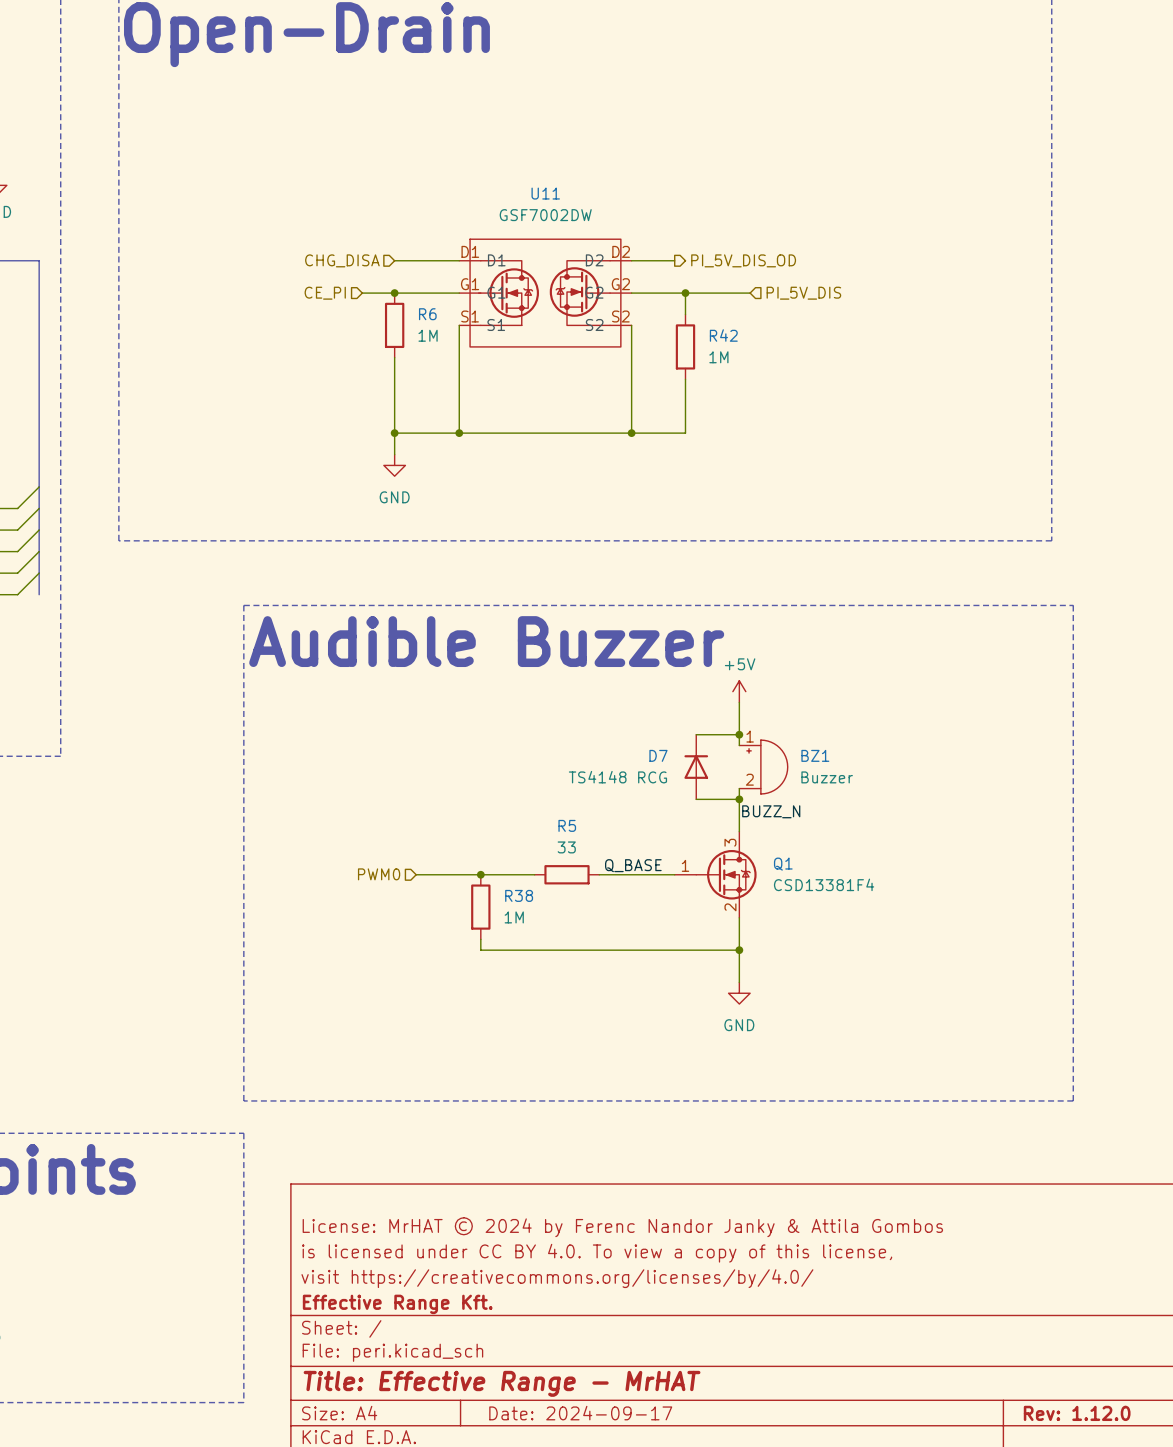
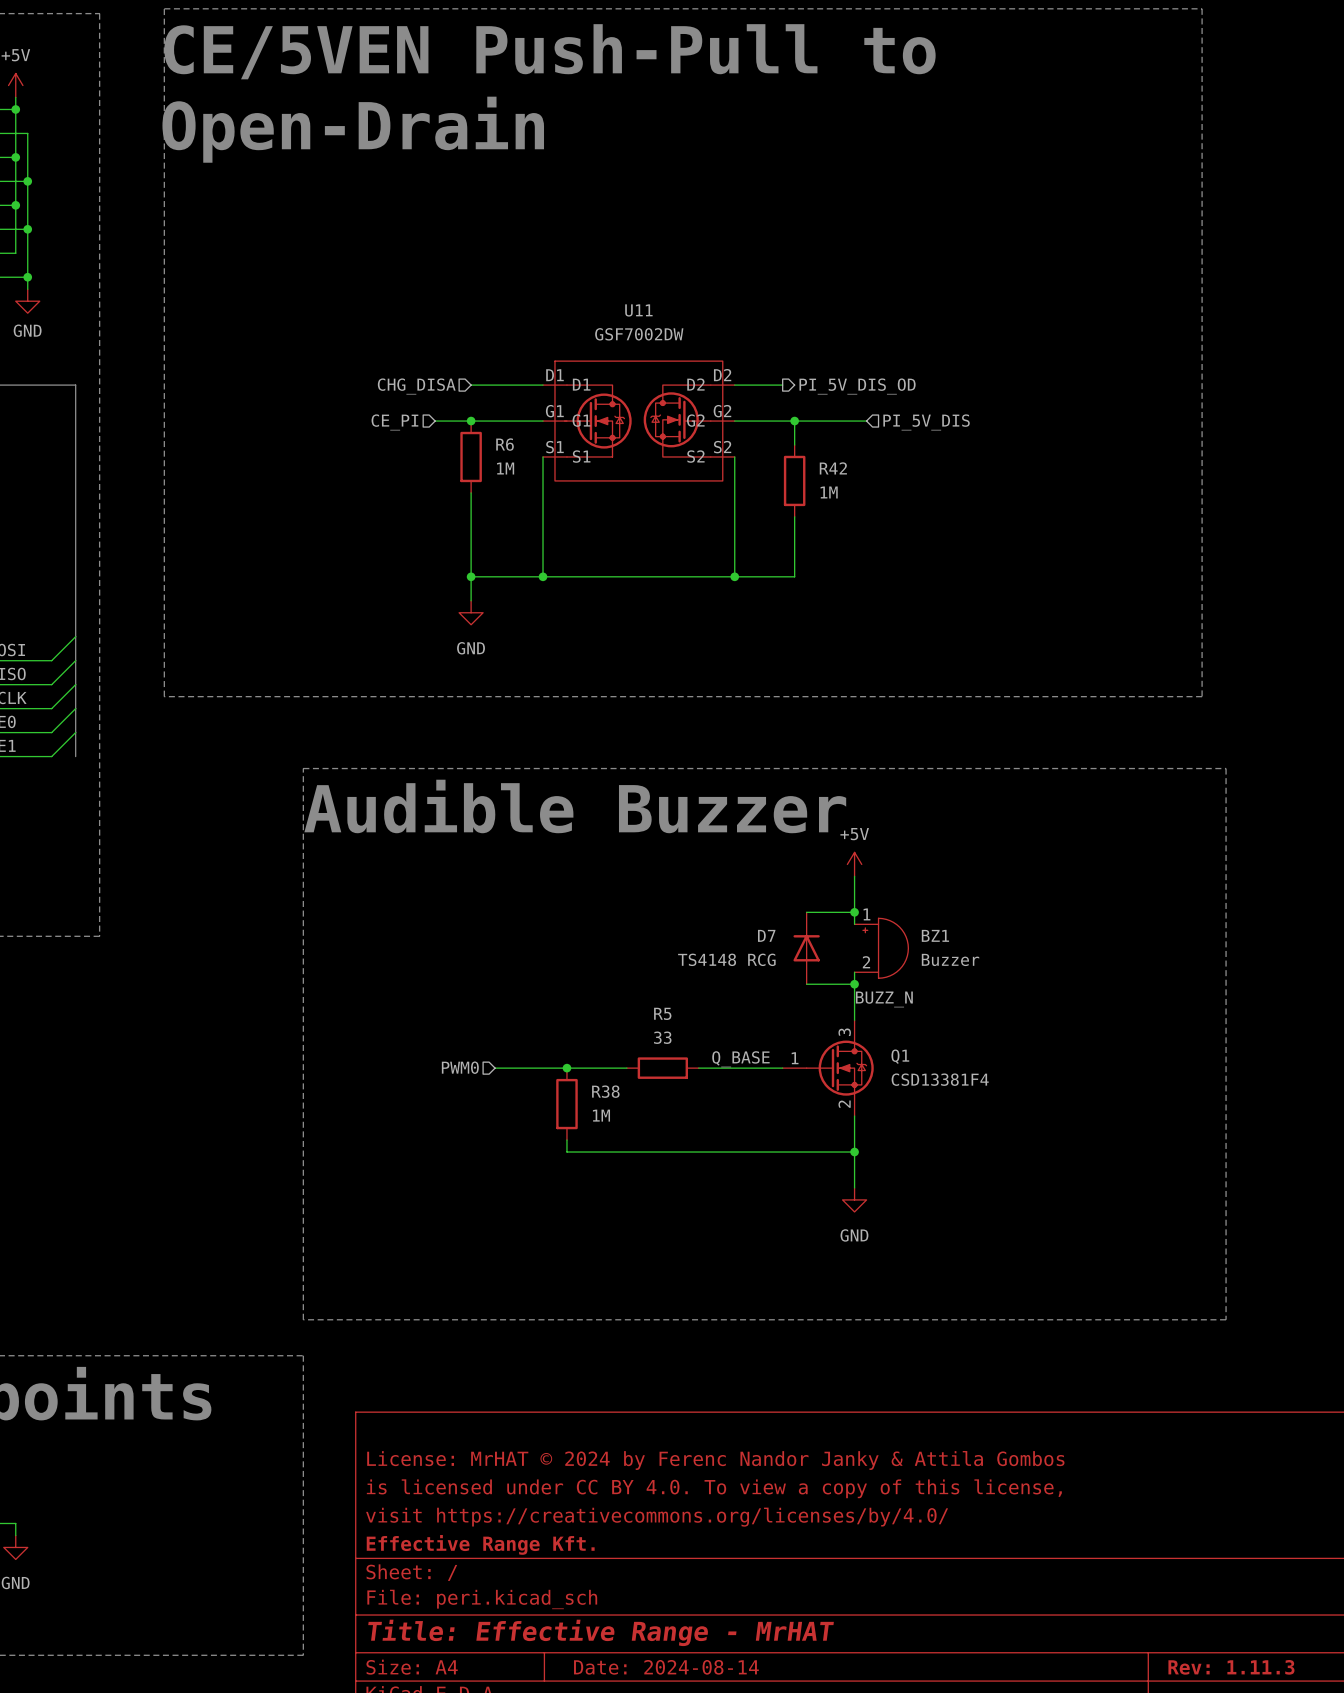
title block: Date: 2024-09-17 (580, 1413) -> Date: 2024-08-14 (666, 1667)
title block: Rev: 1.12.0 (1077, 1413) -> Rev: 1.11.3 (1231, 1667)

